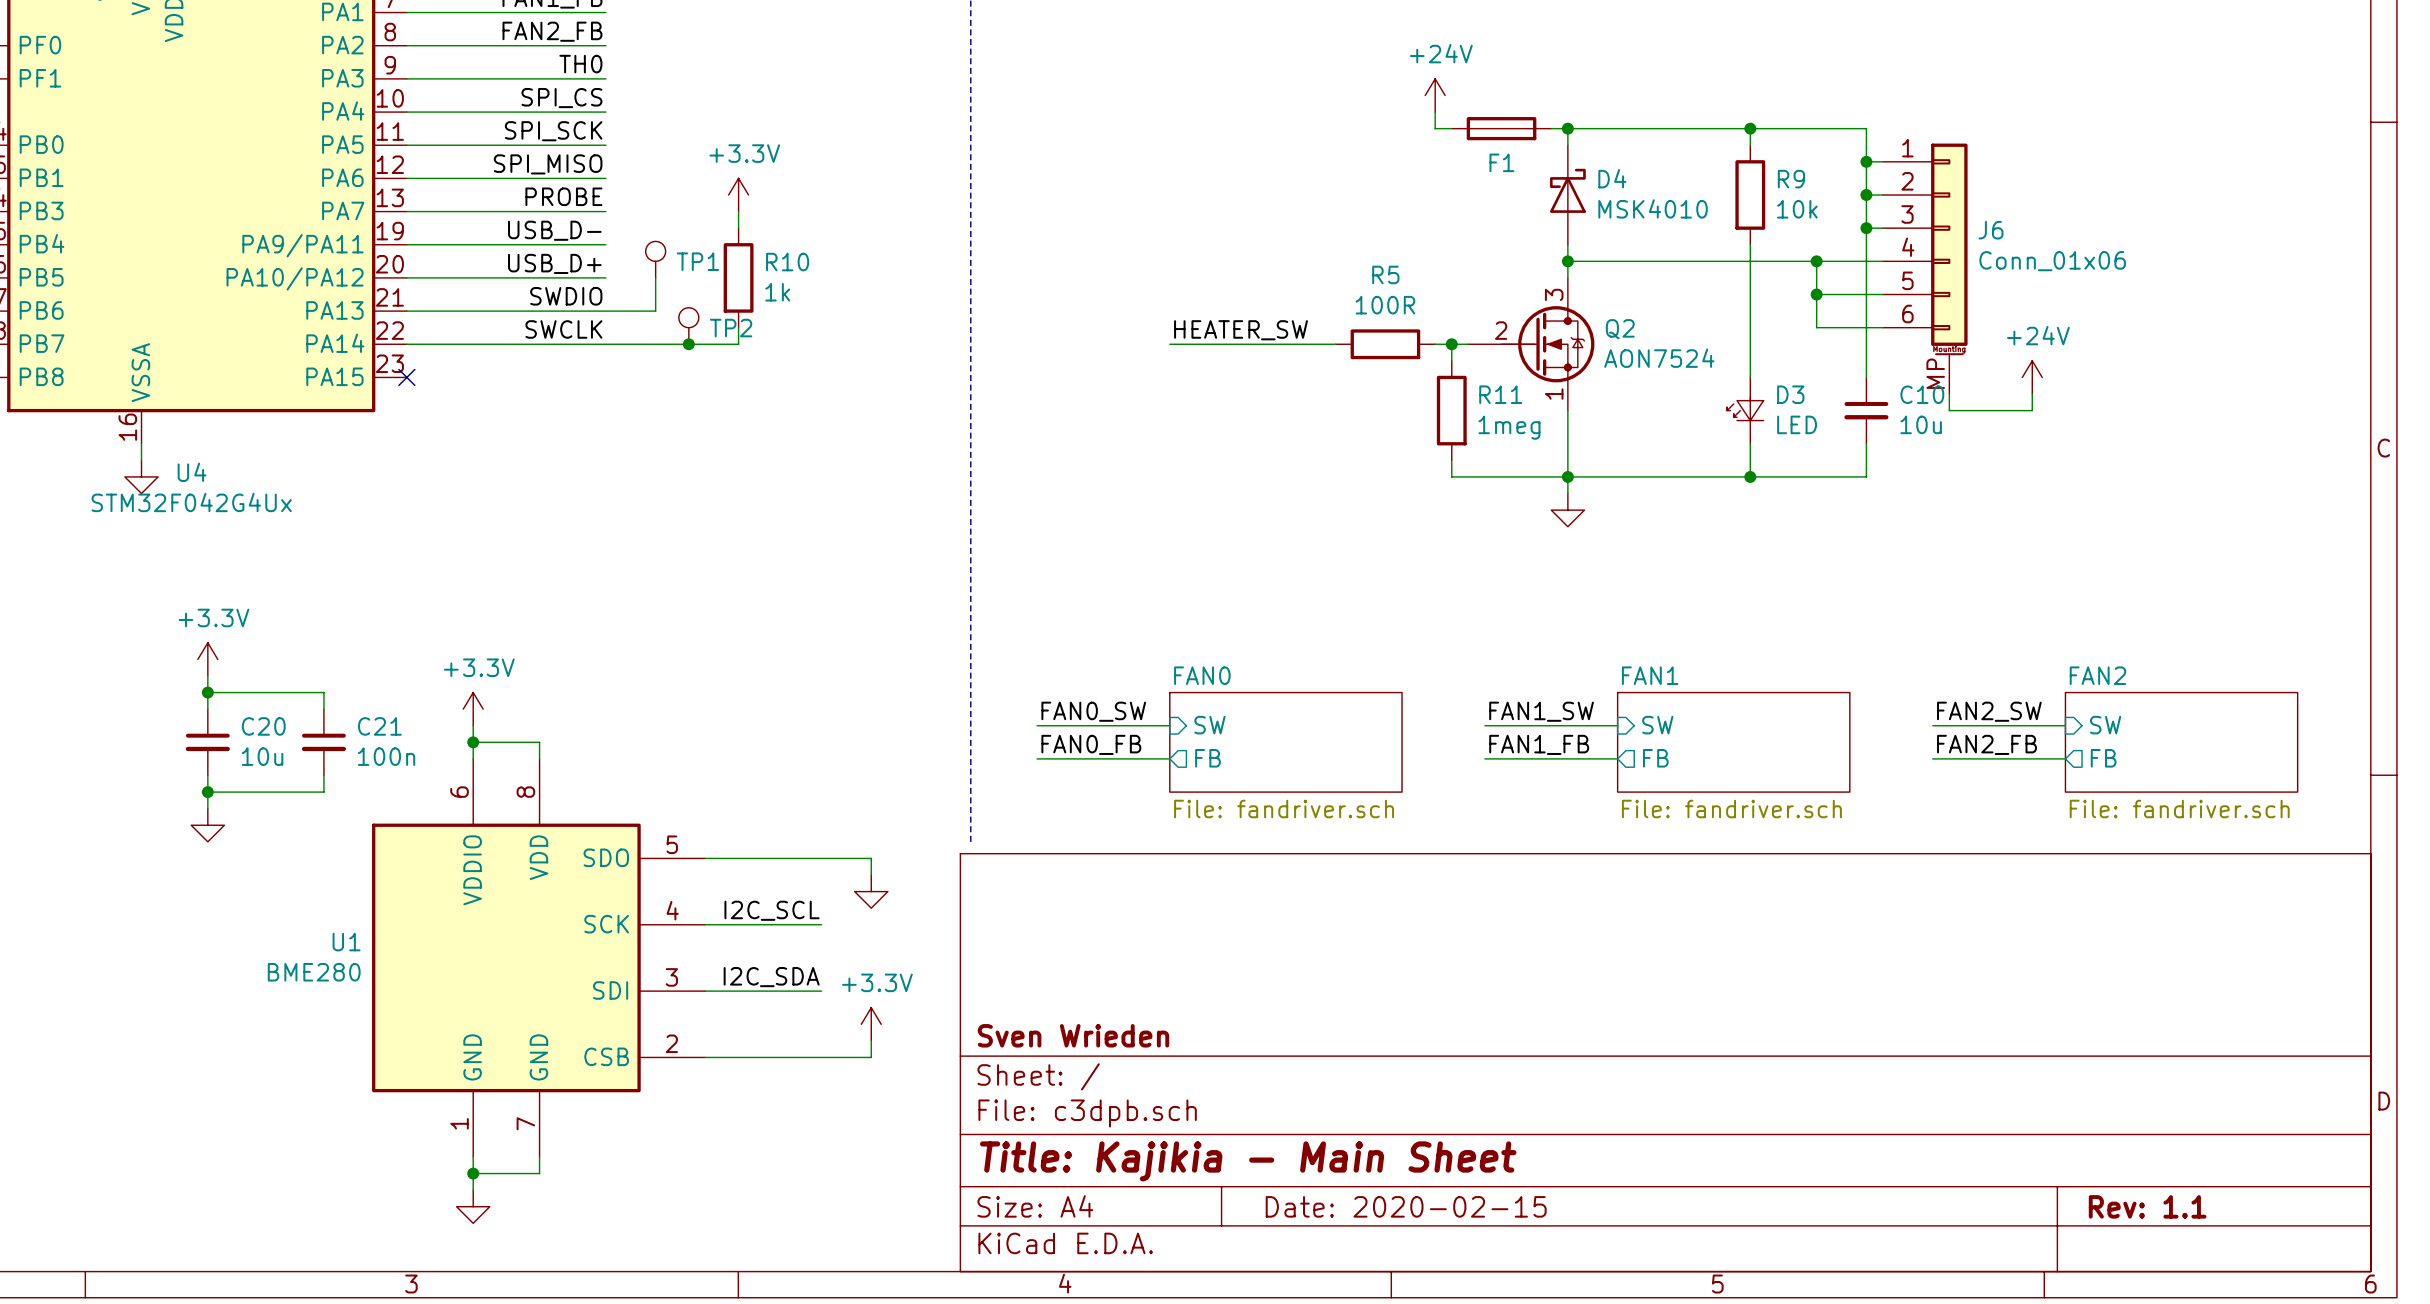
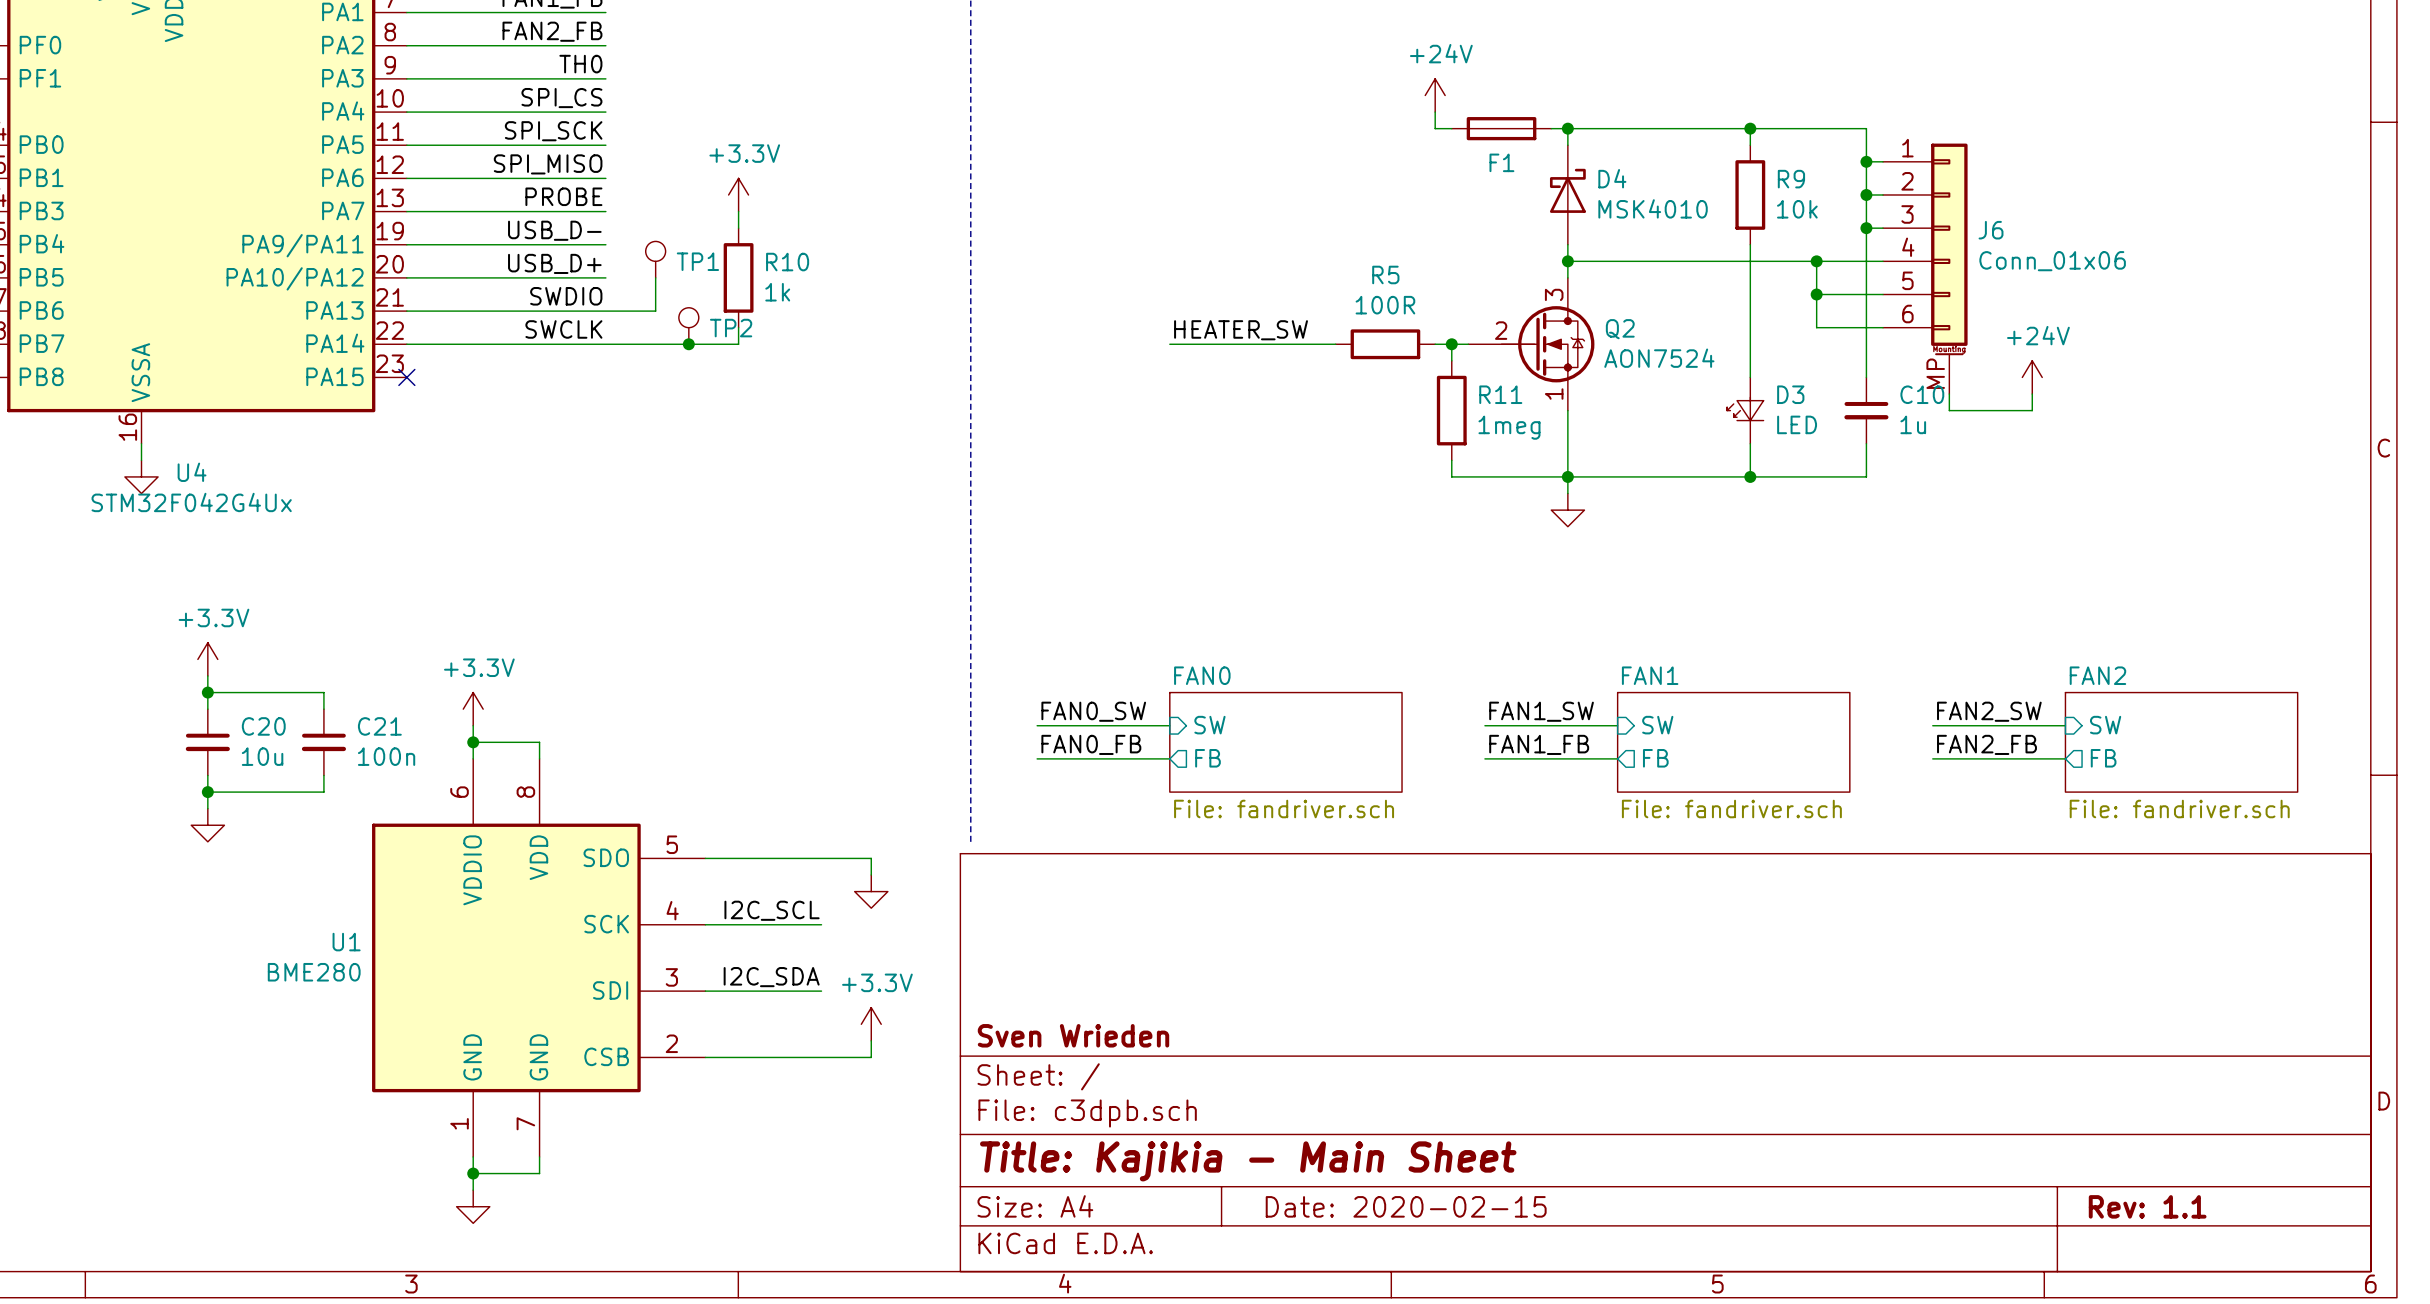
C10 value: 10u (1921, 424) -> 1u (1913, 424)

